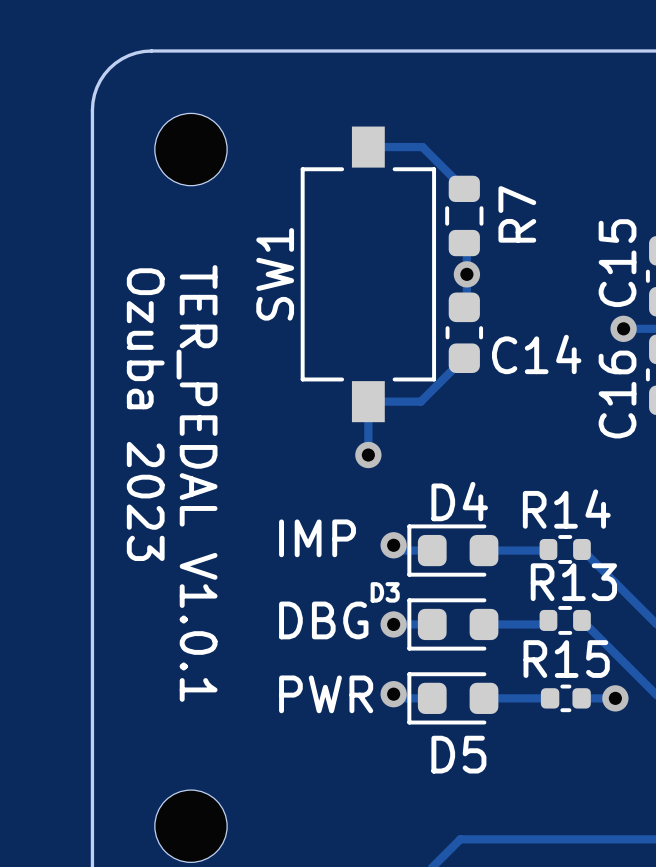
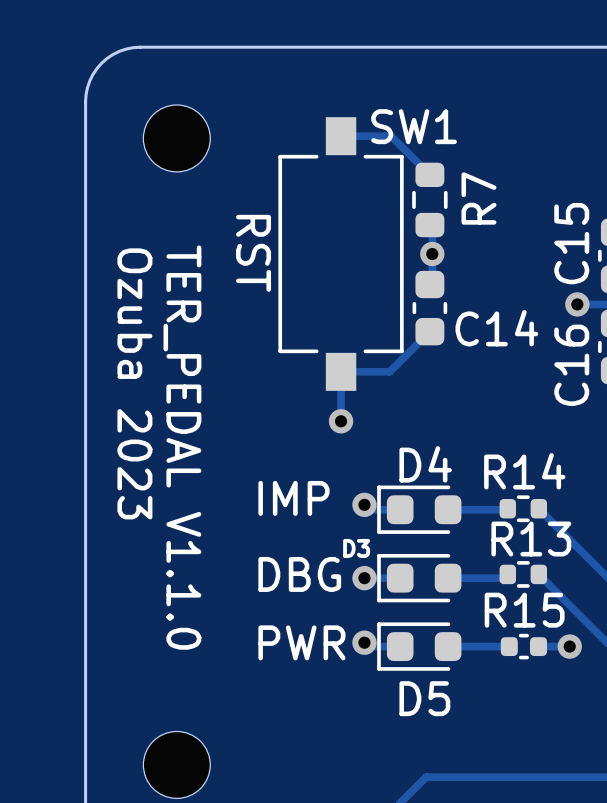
text: none -> RST (253, 253)
SW1 name rotation: 0° (275, 274) -> 90° clockwise (414, 126)
SW1 name position: SW1 (275, 274) -> SW1 (414, 126)
text: TER_PEDAL V1.0.1 (197, 483) -> TER_PEDAL V1.1.0 (182, 447)

